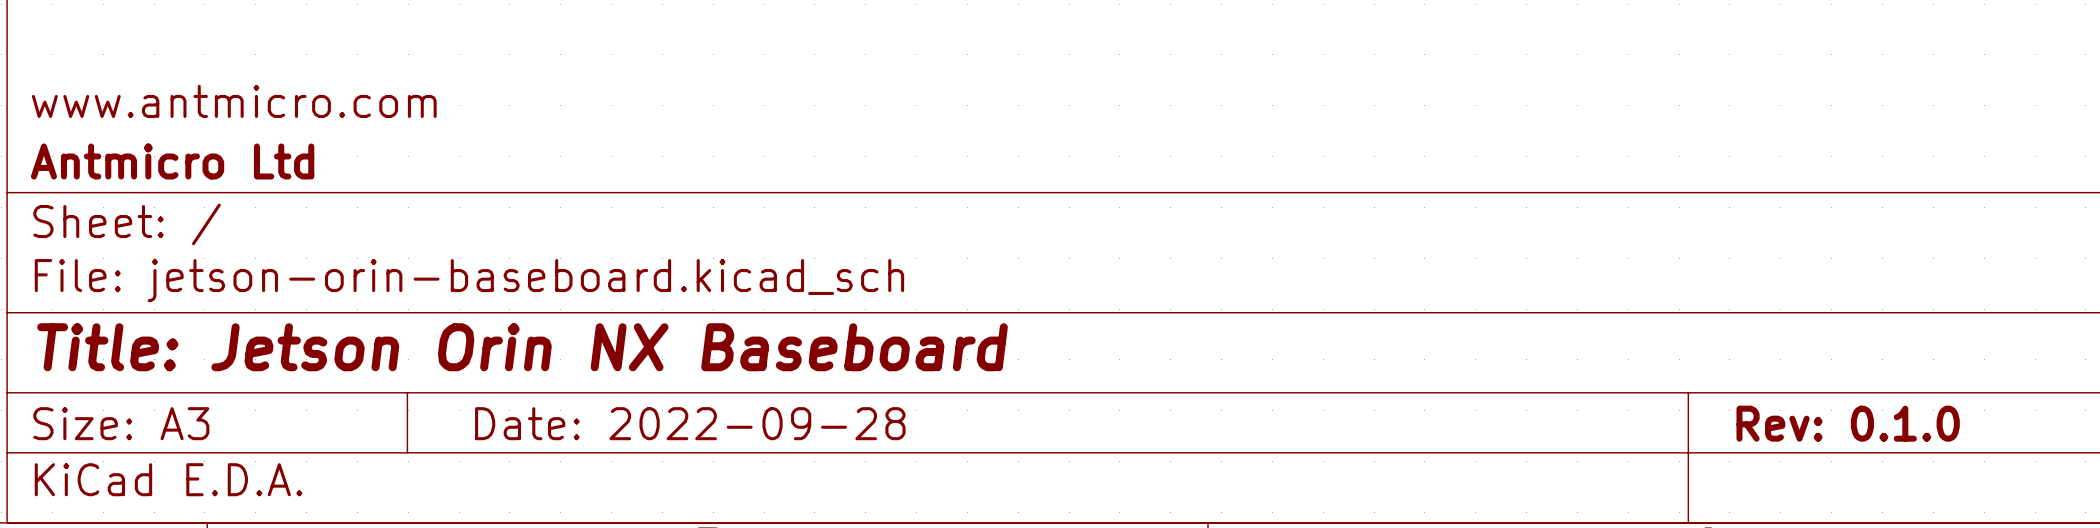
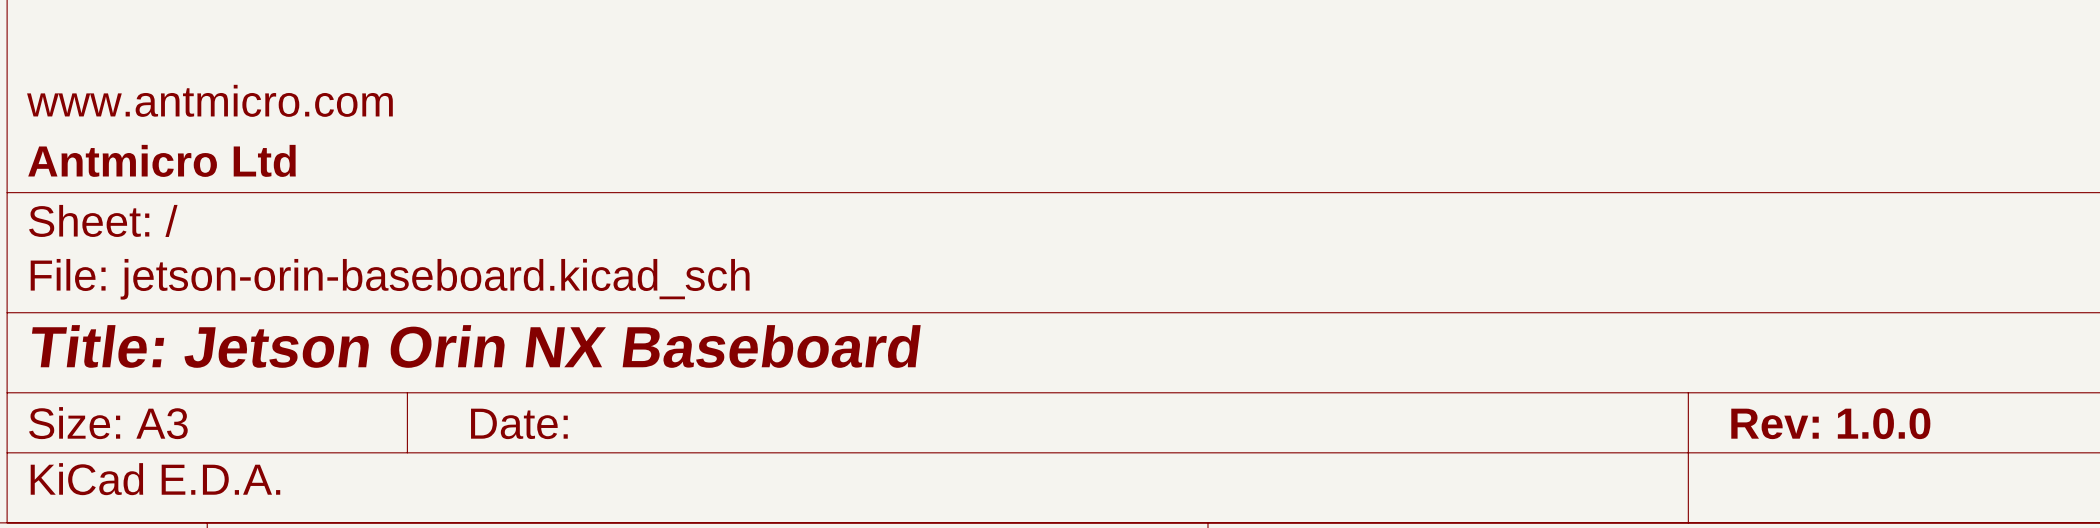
title block: Date: 2022-09-28 (690, 423) -> Date: (519, 423)
title block: Rev: 0.1.0 (1848, 423) -> Rev: 1.0.0 (1830, 423)

